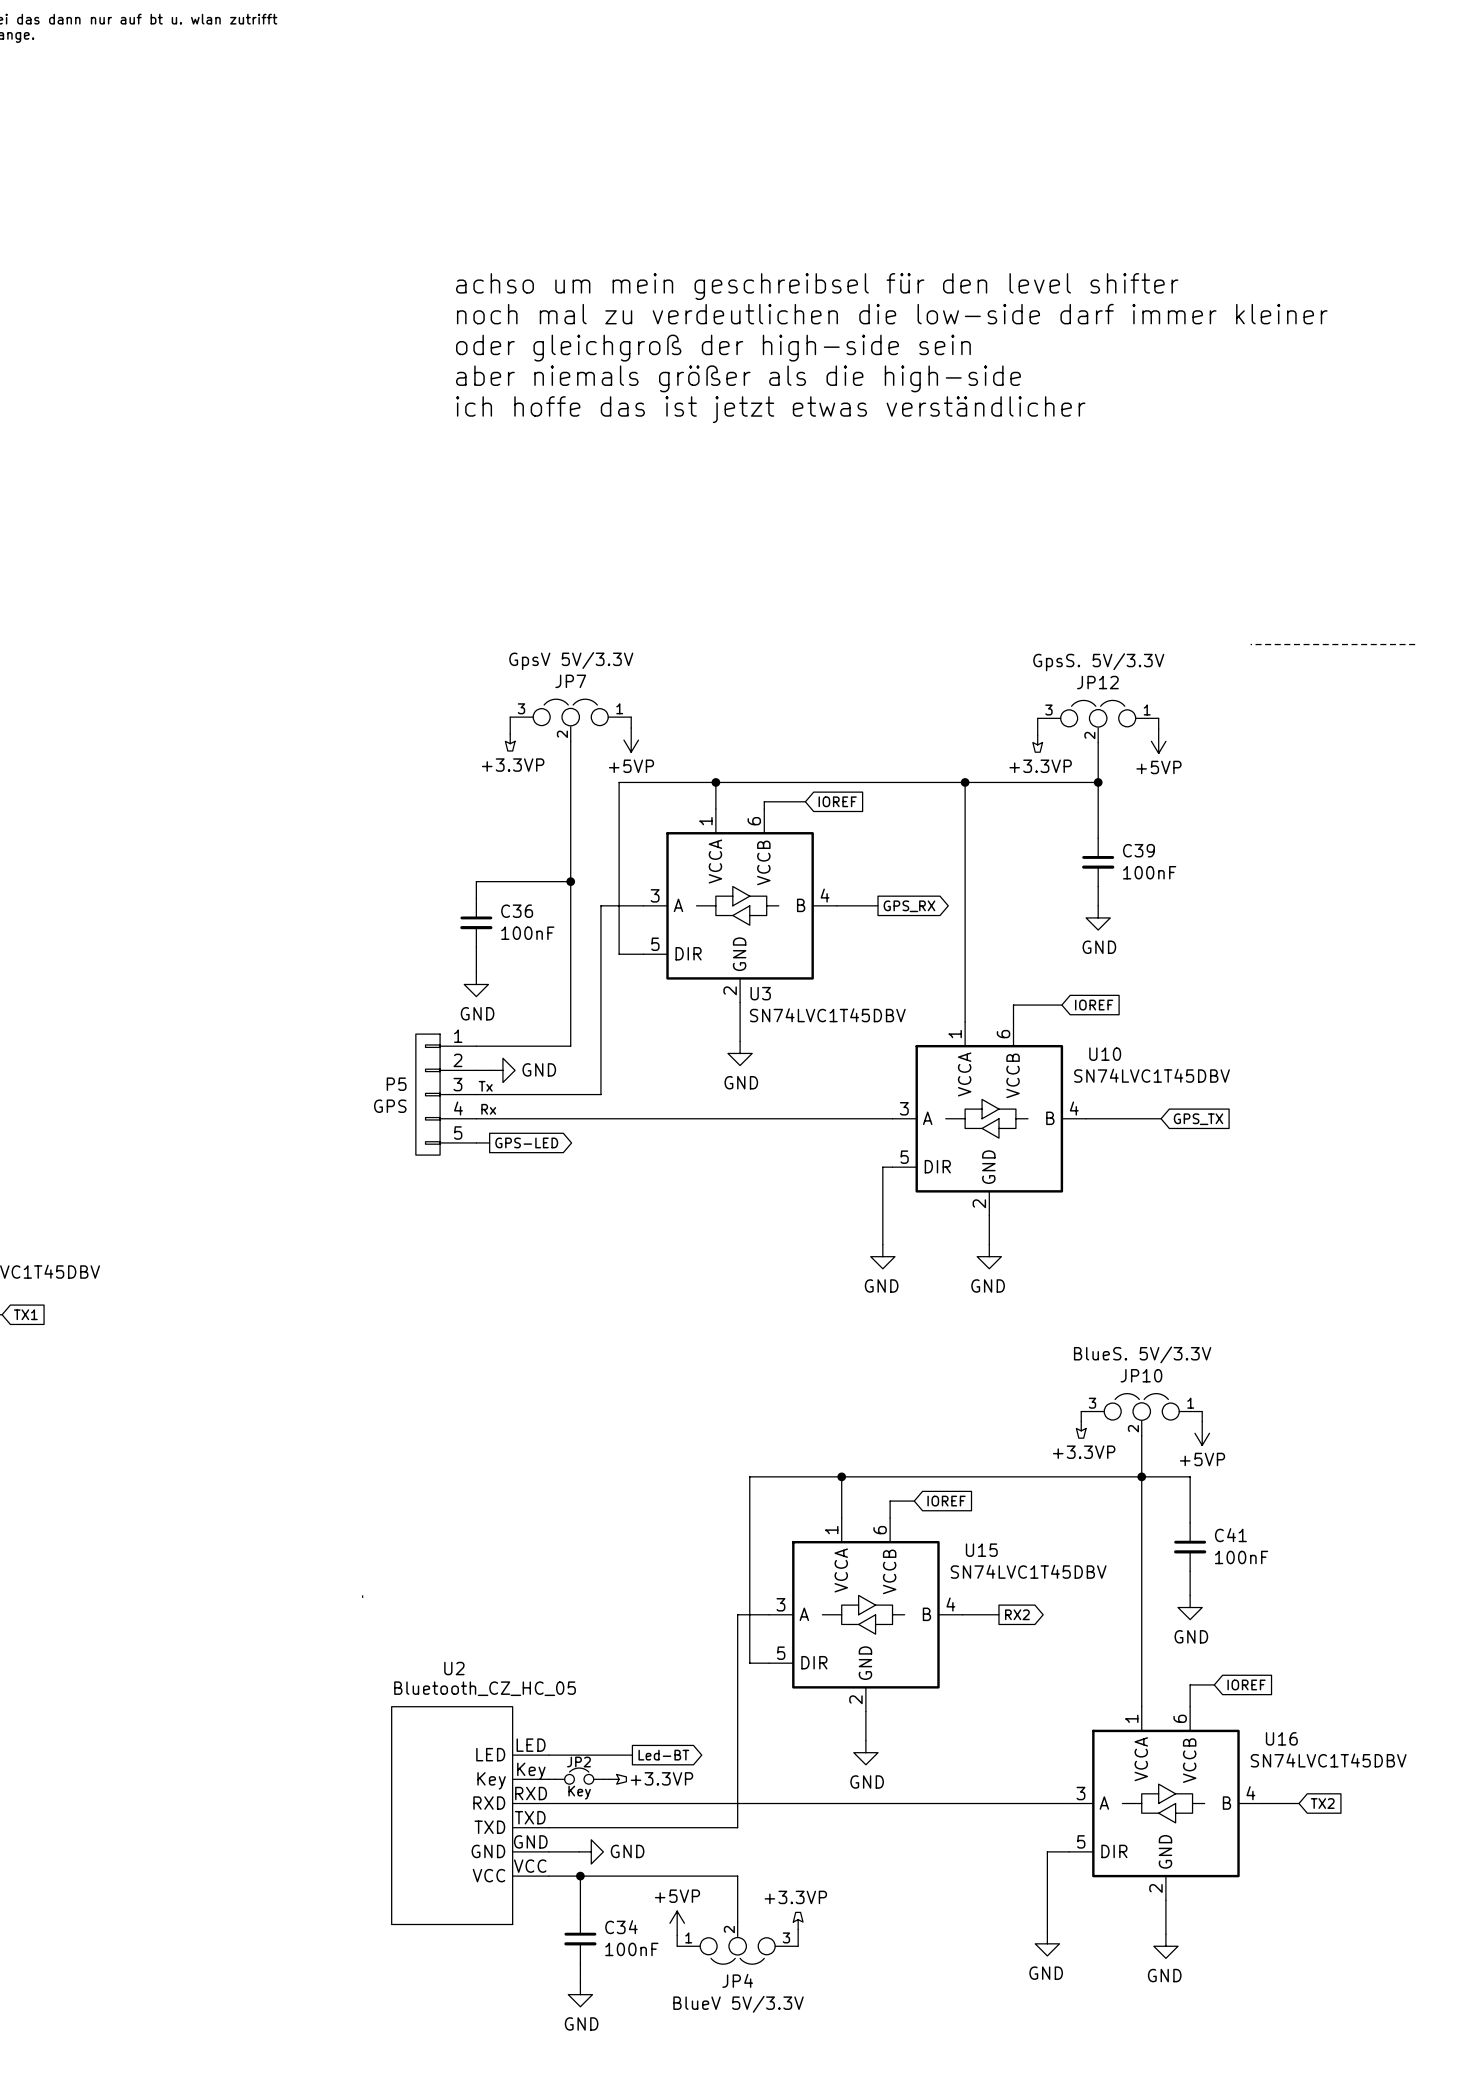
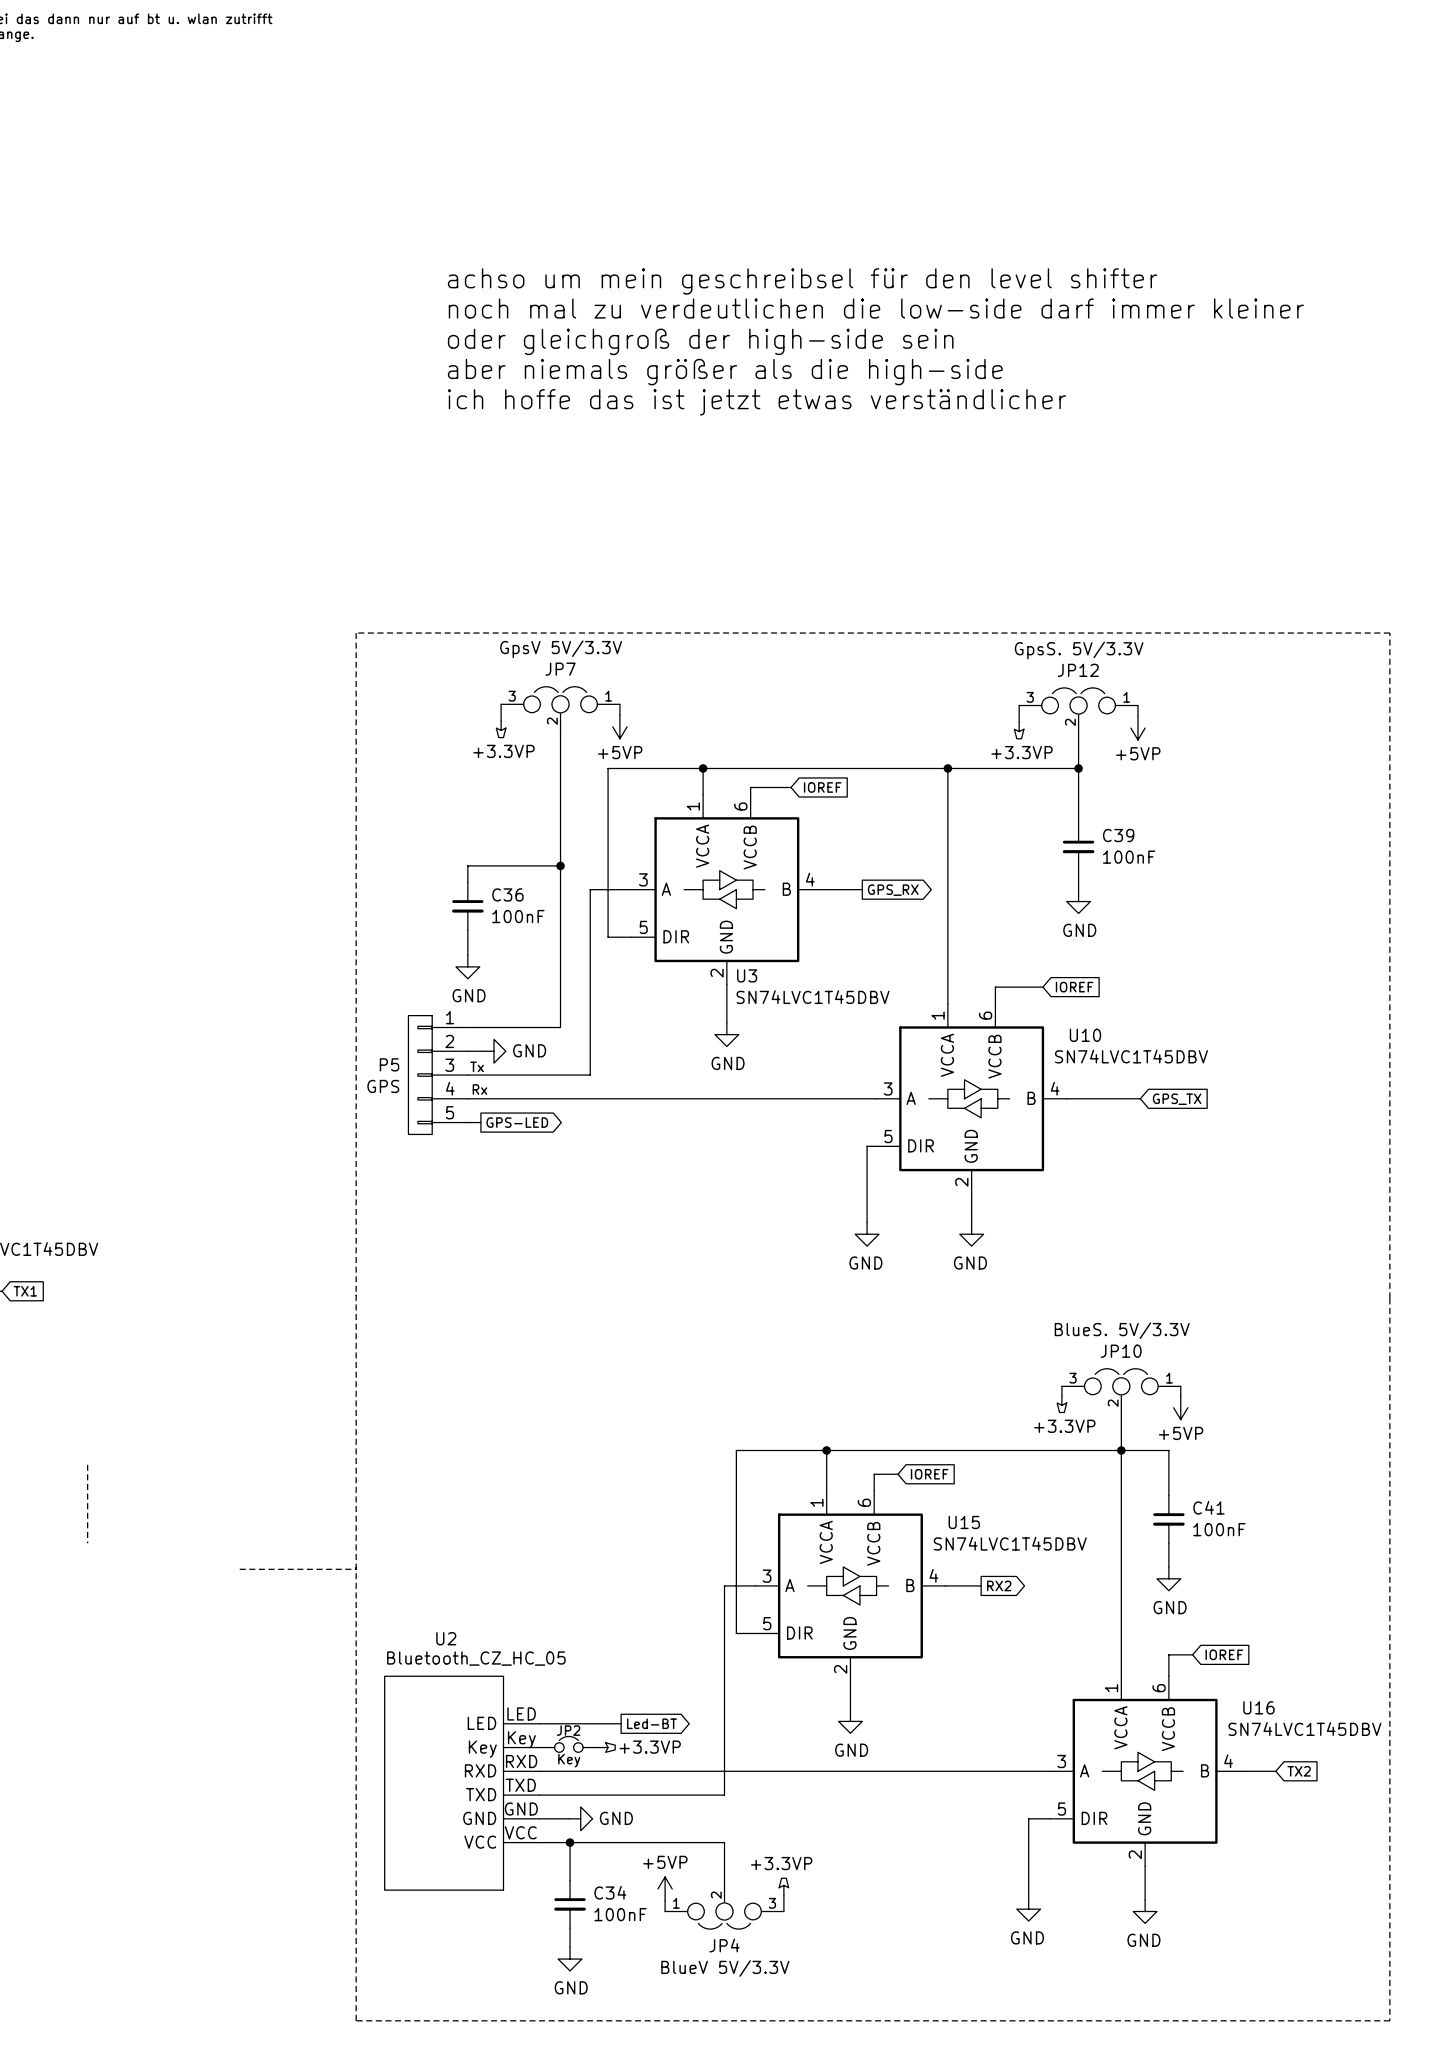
line: none -> (1228, 633) (356, 633) (356, 1566)
line: none -> (1389, 633) (1389, 2020) (356, 2020) (356, 1569) (239, 1569)
line: none -> (87, 1464) (87, 1543)

